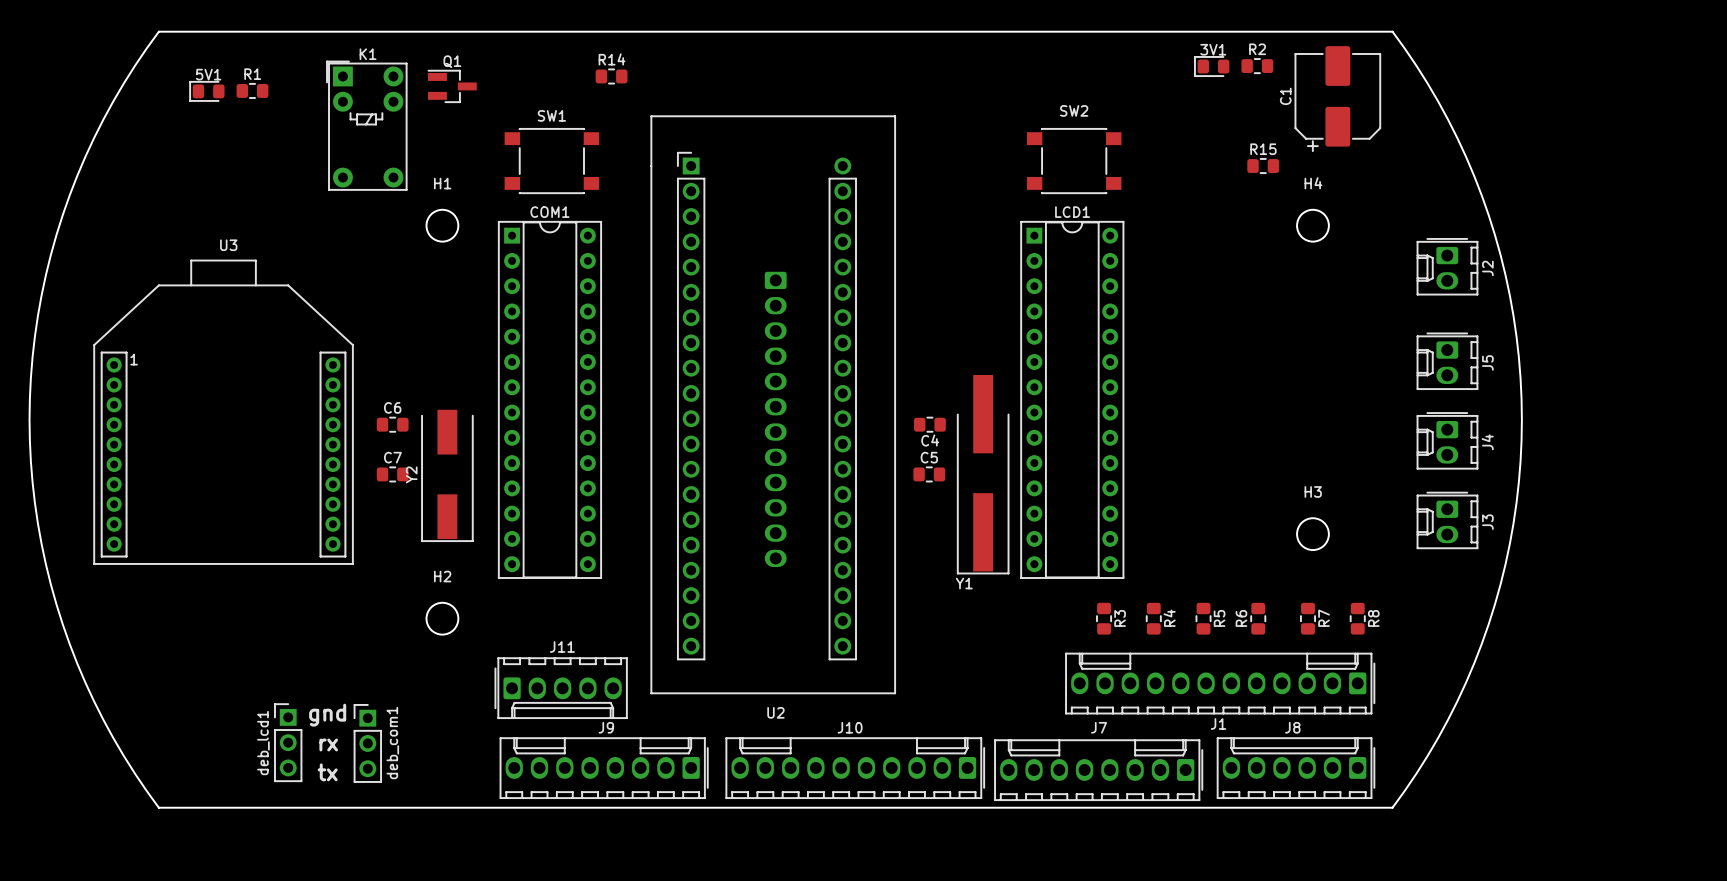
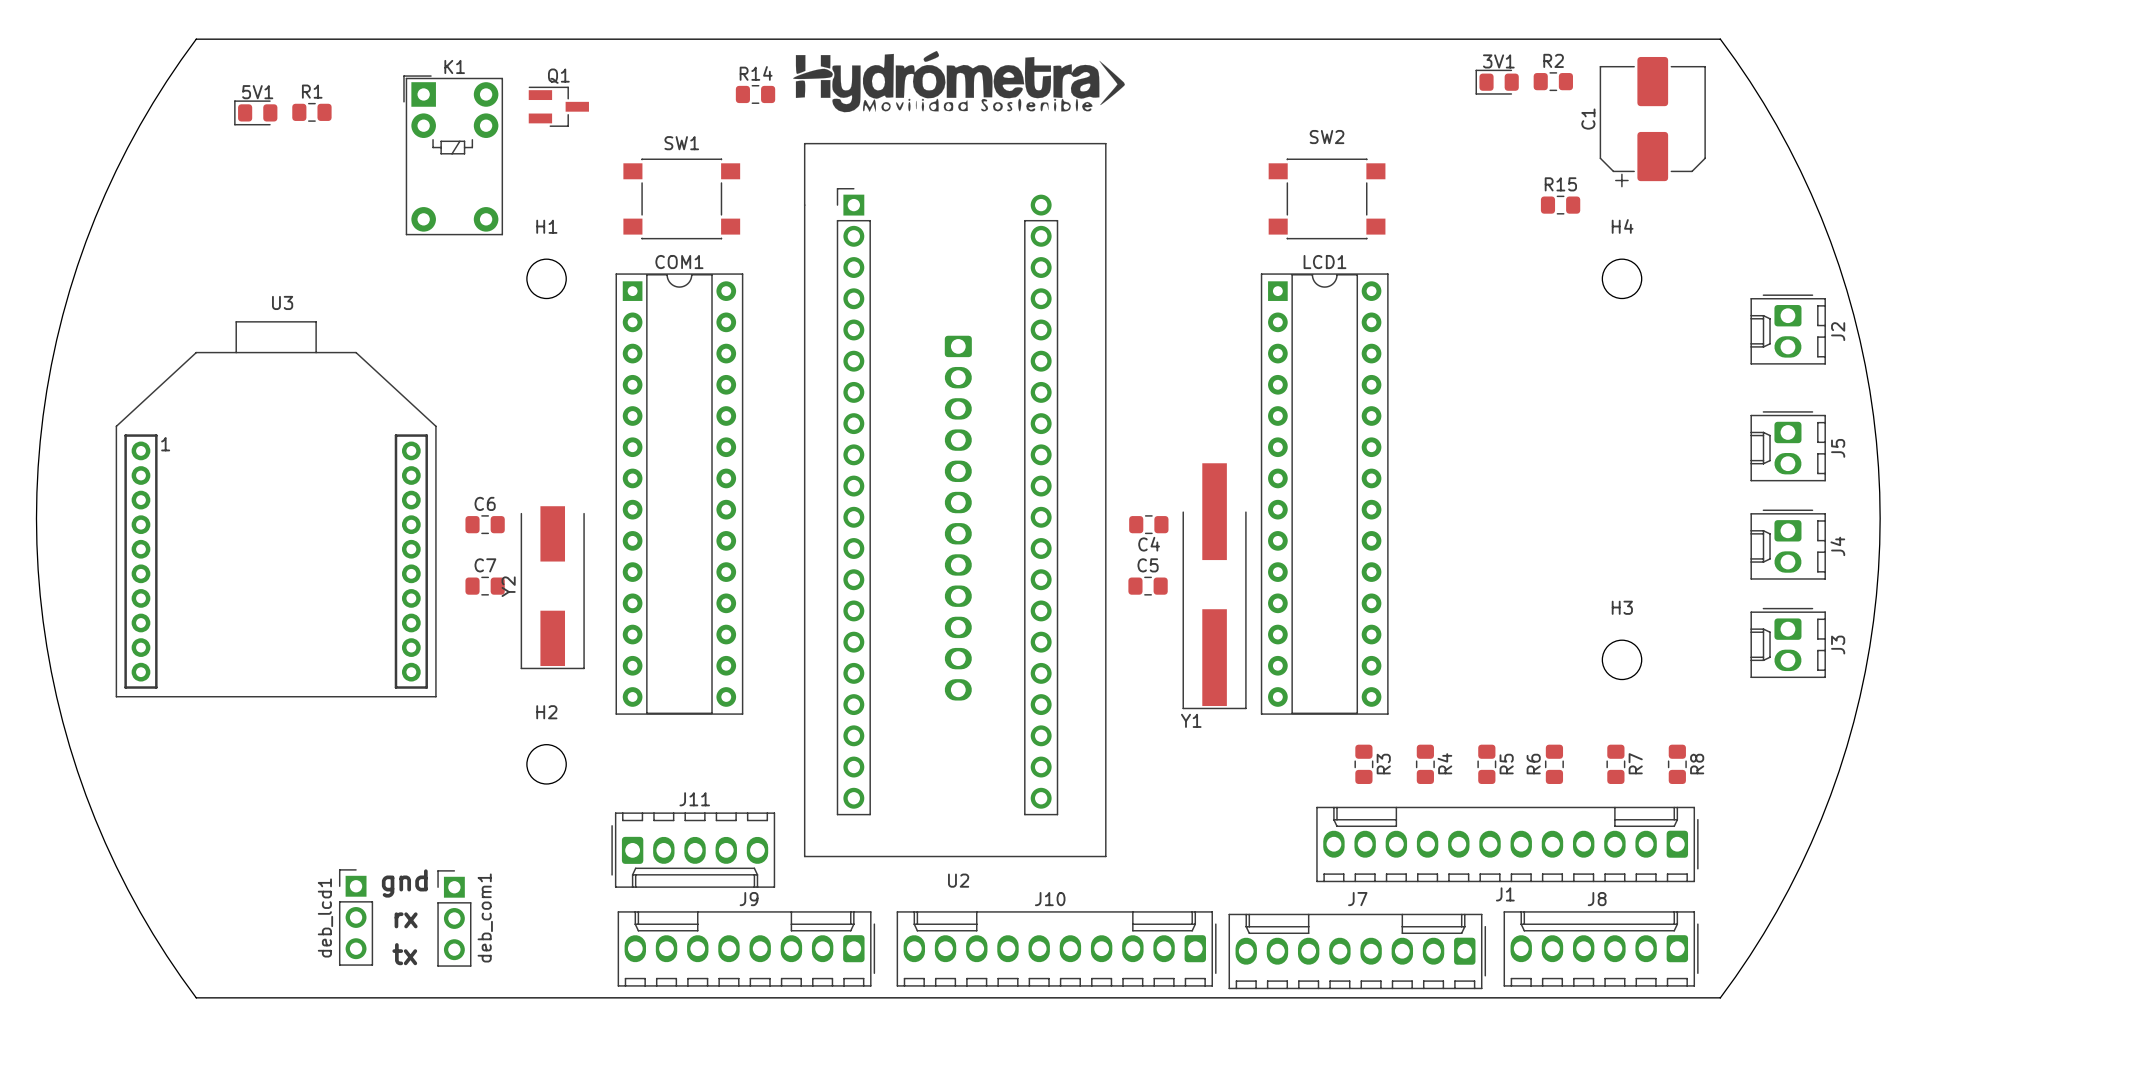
drawing: none -> [793, 51, 1125, 113]

